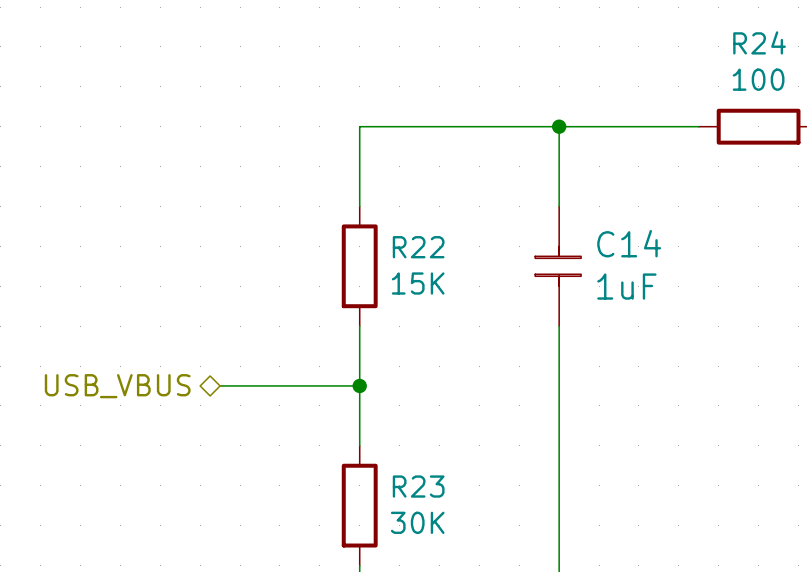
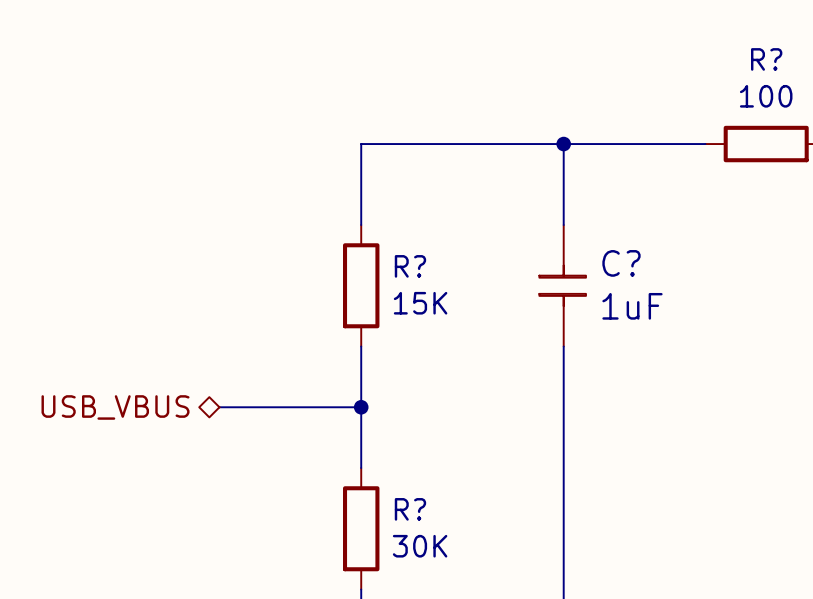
R24 name: R24 (759, 42) -> R? (766, 59)
C14 name: C14 (629, 243) -> C? (621, 263)
R22 name: R22 (418, 247) -> R? (410, 266)
R23 name: R23 (418, 486) -> R? (410, 509)

